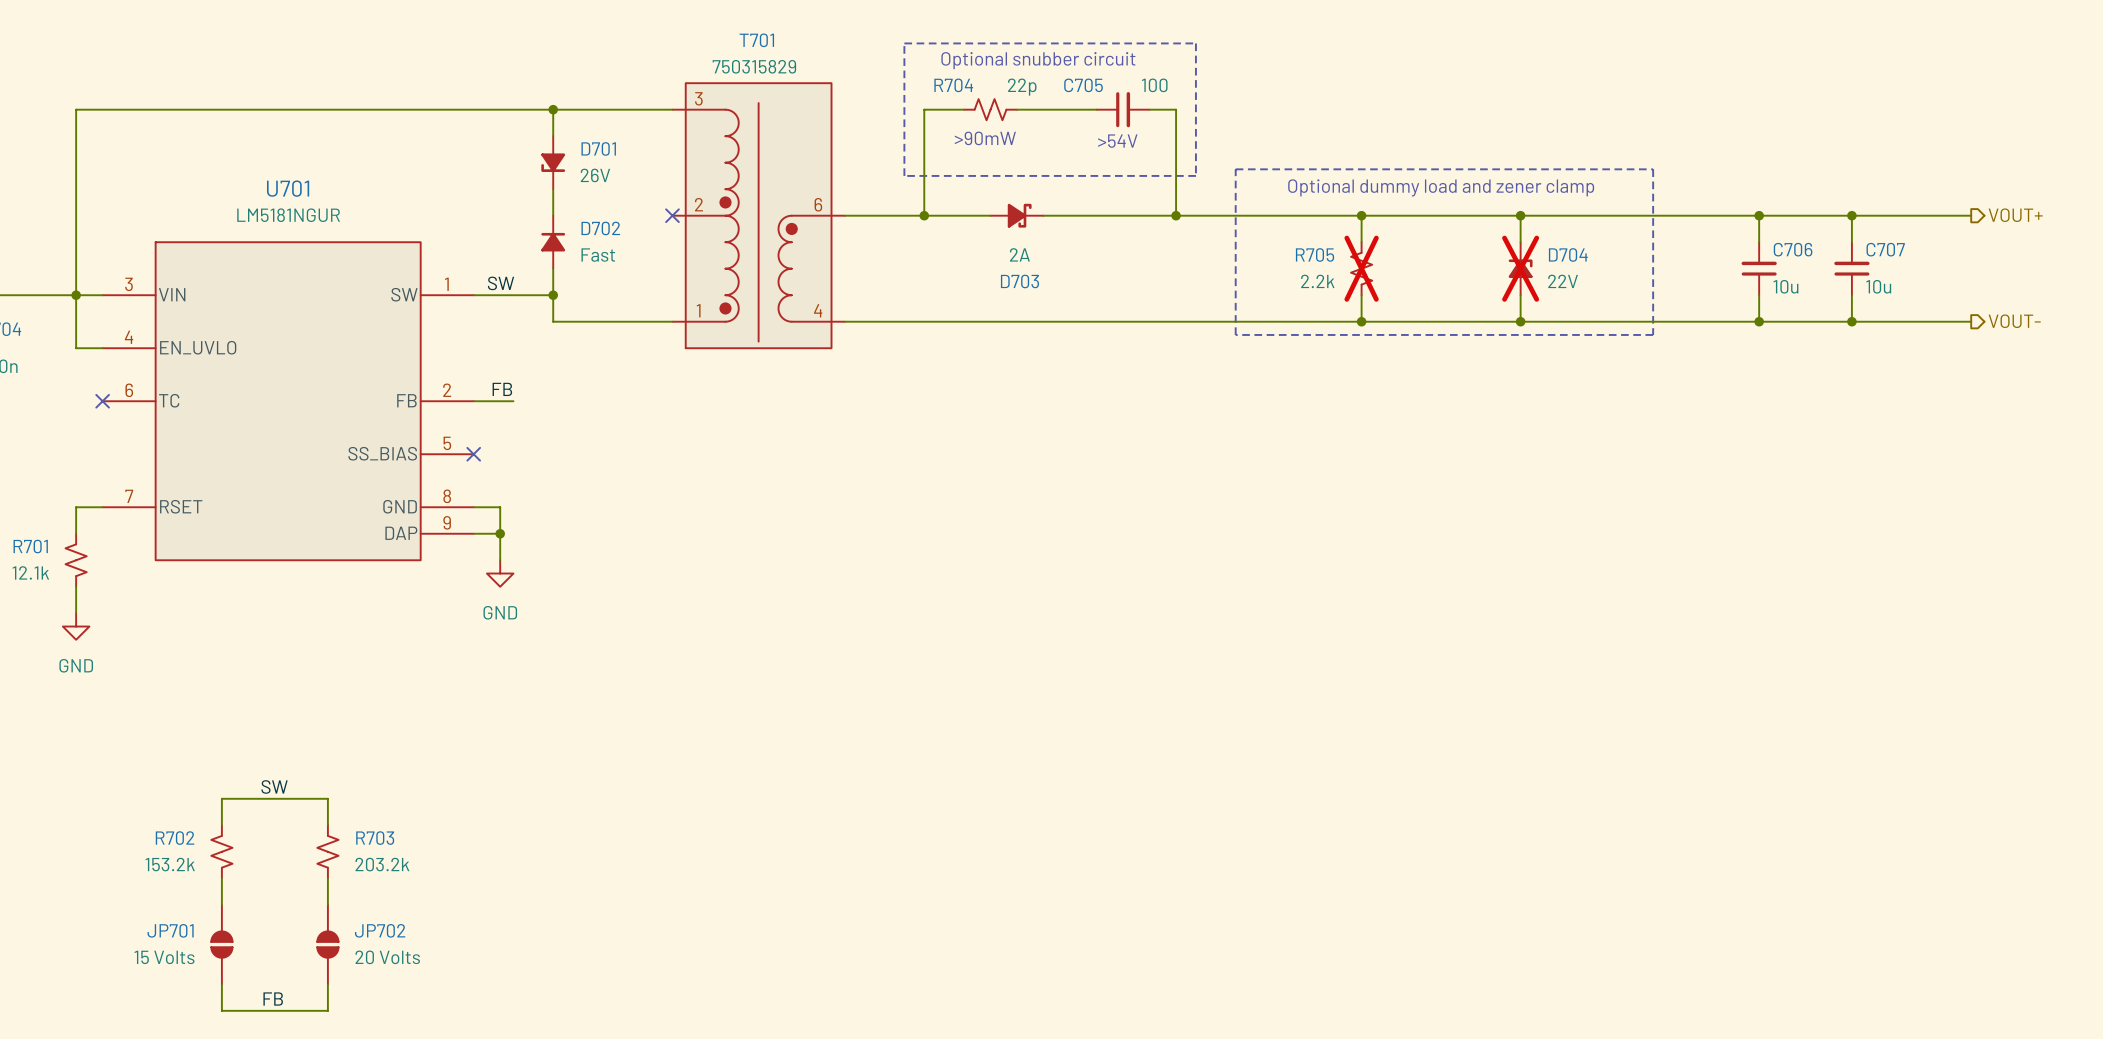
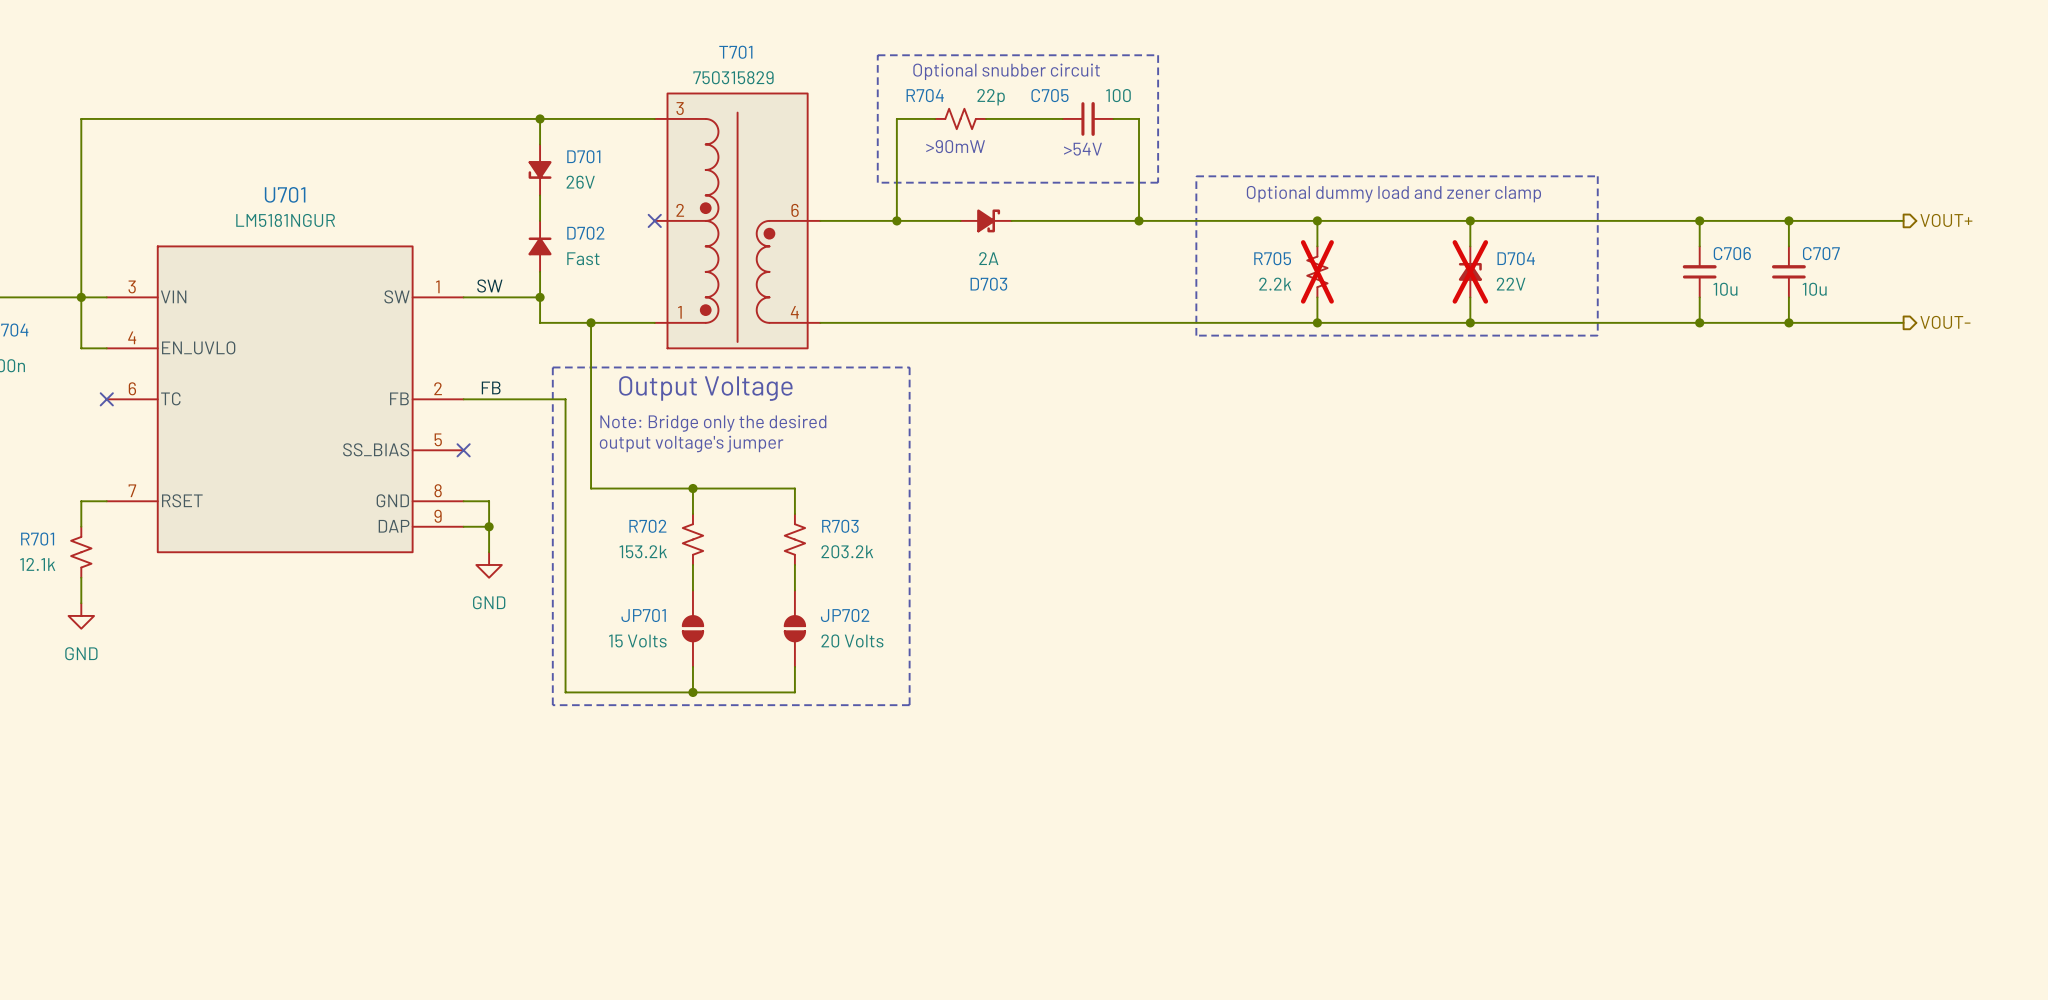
wire: none -> (591, 322) (591, 488) (794, 488) (794, 514)
junction: none -> (591, 322)
line: none -> (552, 367) (909, 367) (909, 705) (552, 705) (552, 367)
text: none -> Output Voltage (705, 388)
wire: none -> (501, 399) (565, 399) (565, 692) (794, 692) (794, 666)
text: none -> Note: Bridge only the desired (713, 423)
text: none -> output voltage's jumper (691, 444)
wire: none -> (692, 488) (692, 514)
junction: none -> (692, 488)
wire: none -> (692, 564) (692, 590)
wire: none -> (794, 564) (794, 590)
wire: none -> (692, 666) (692, 692)
junction: none -> (692, 692)
label: SW (274, 786) -> none
wire: (221, 825) (221, 798) (327, 798) (327, 825) -> none
R702 position: (221, 851) -> (692, 539)
R703 position: (327, 851) -> (794, 539)
wire: (221, 878) (221, 904) -> none
wire: (327, 878) (327, 904) -> none
JP701 position: (221, 944) -> (692, 628)
JP702 position: (327, 944) -> (794, 628)
wire: (221, 984) (221, 1010) (327, 1010) (327, 984) -> none
label: FB (273, 999) -> none

